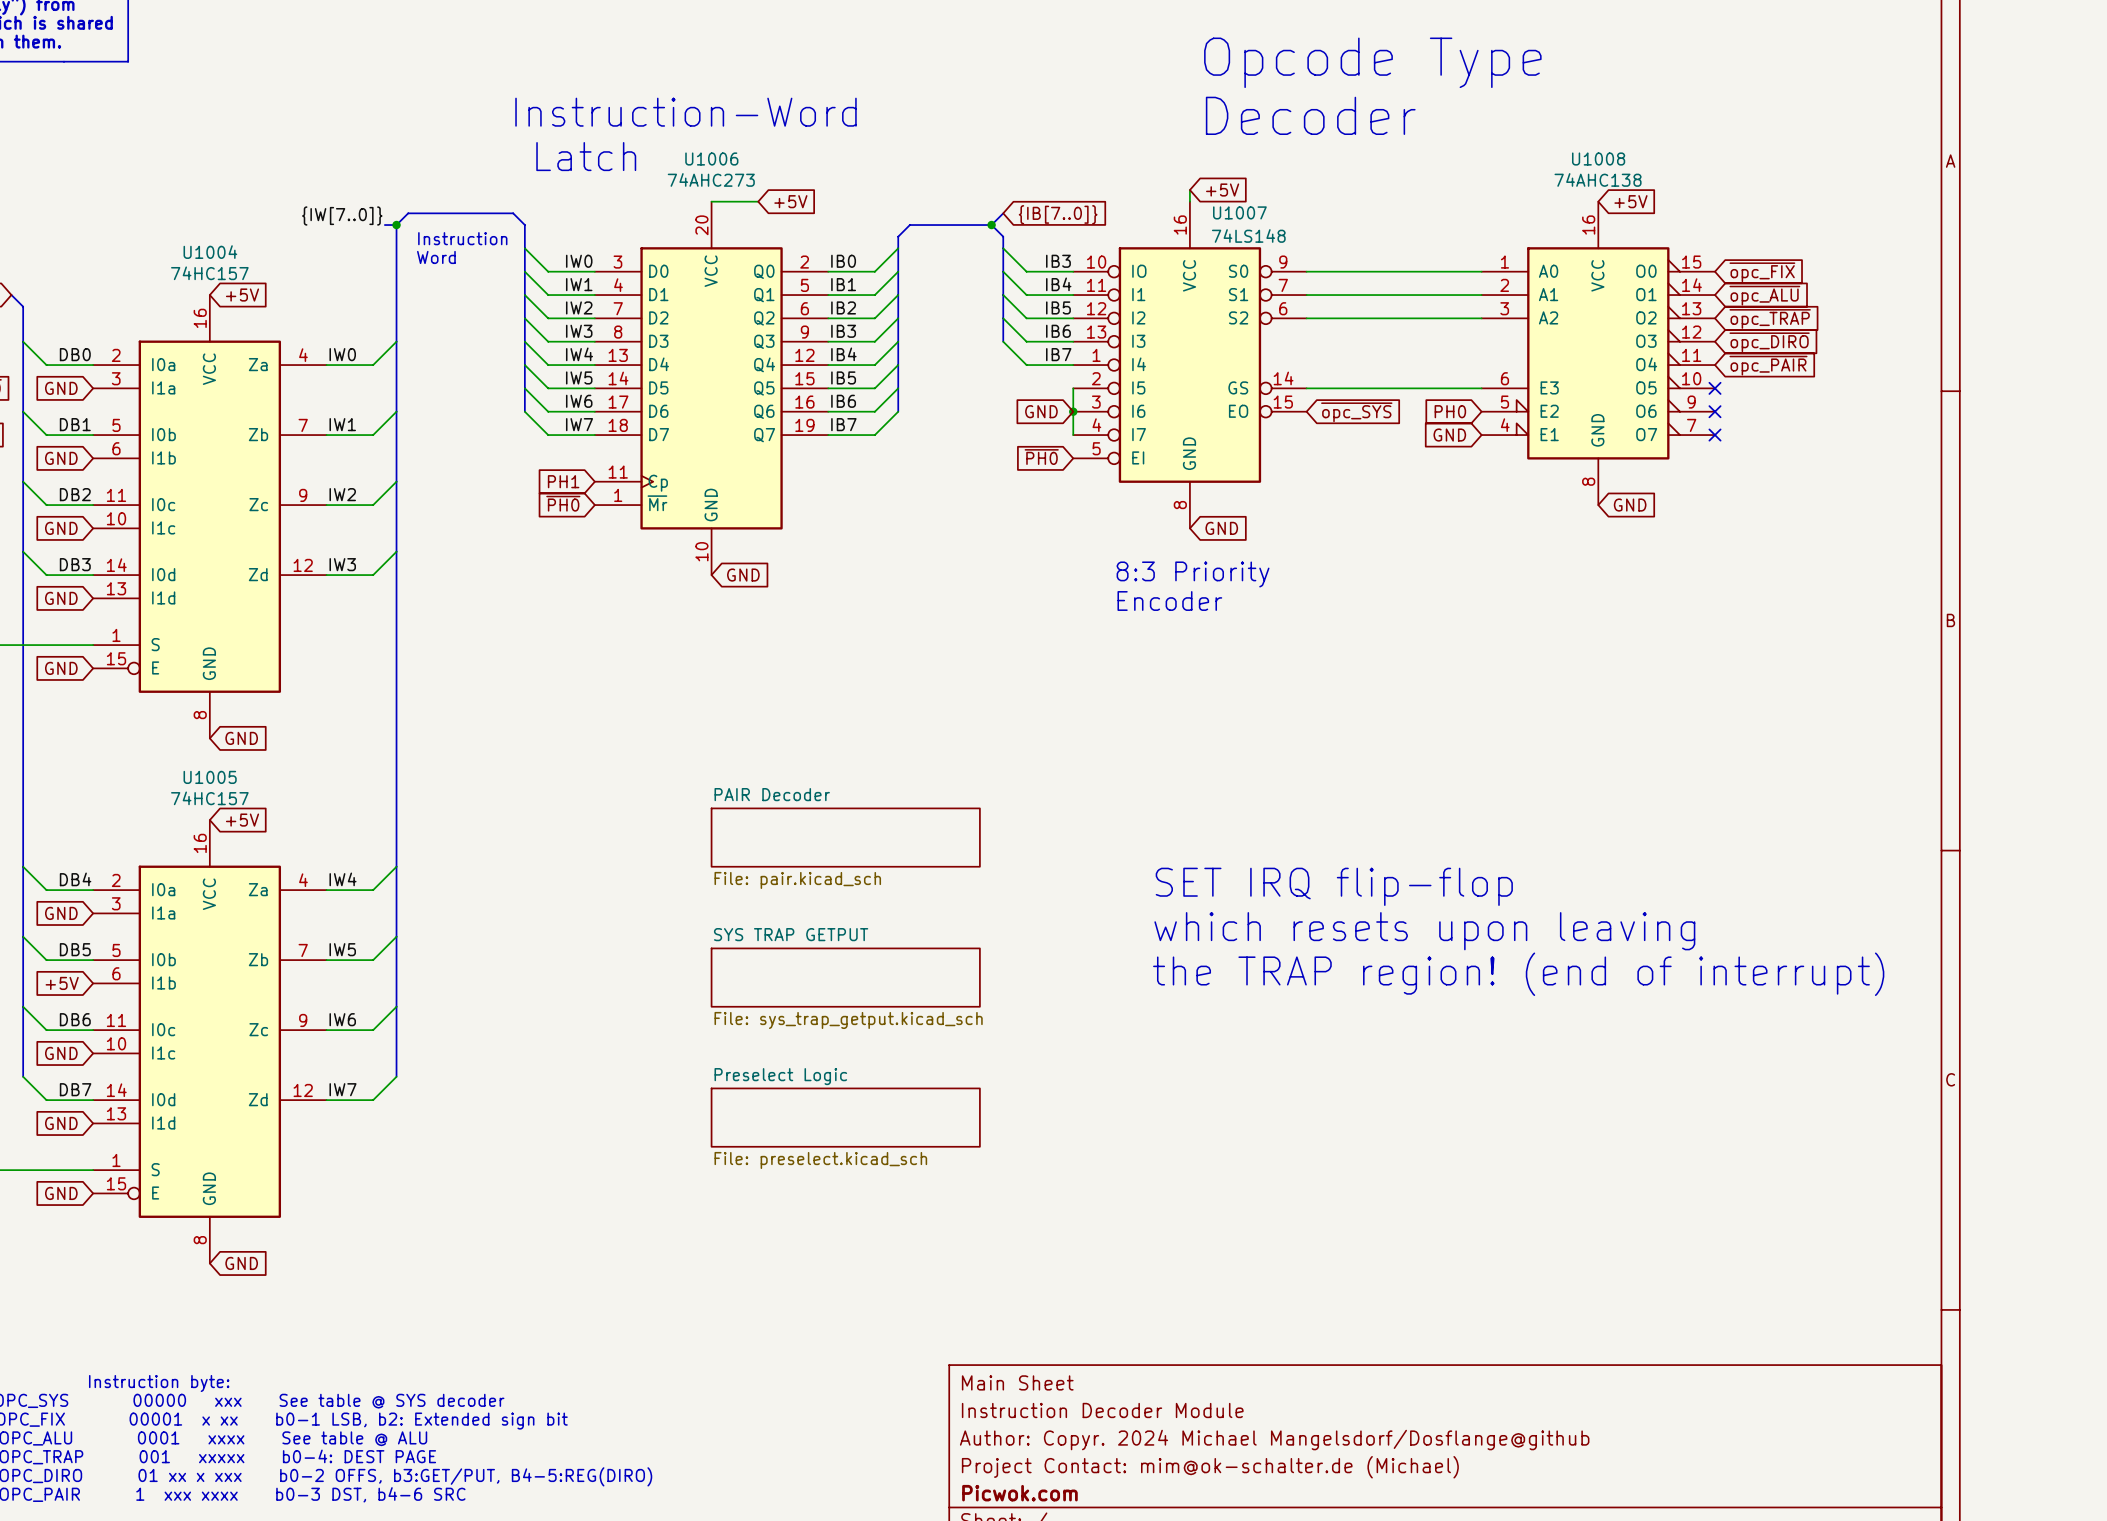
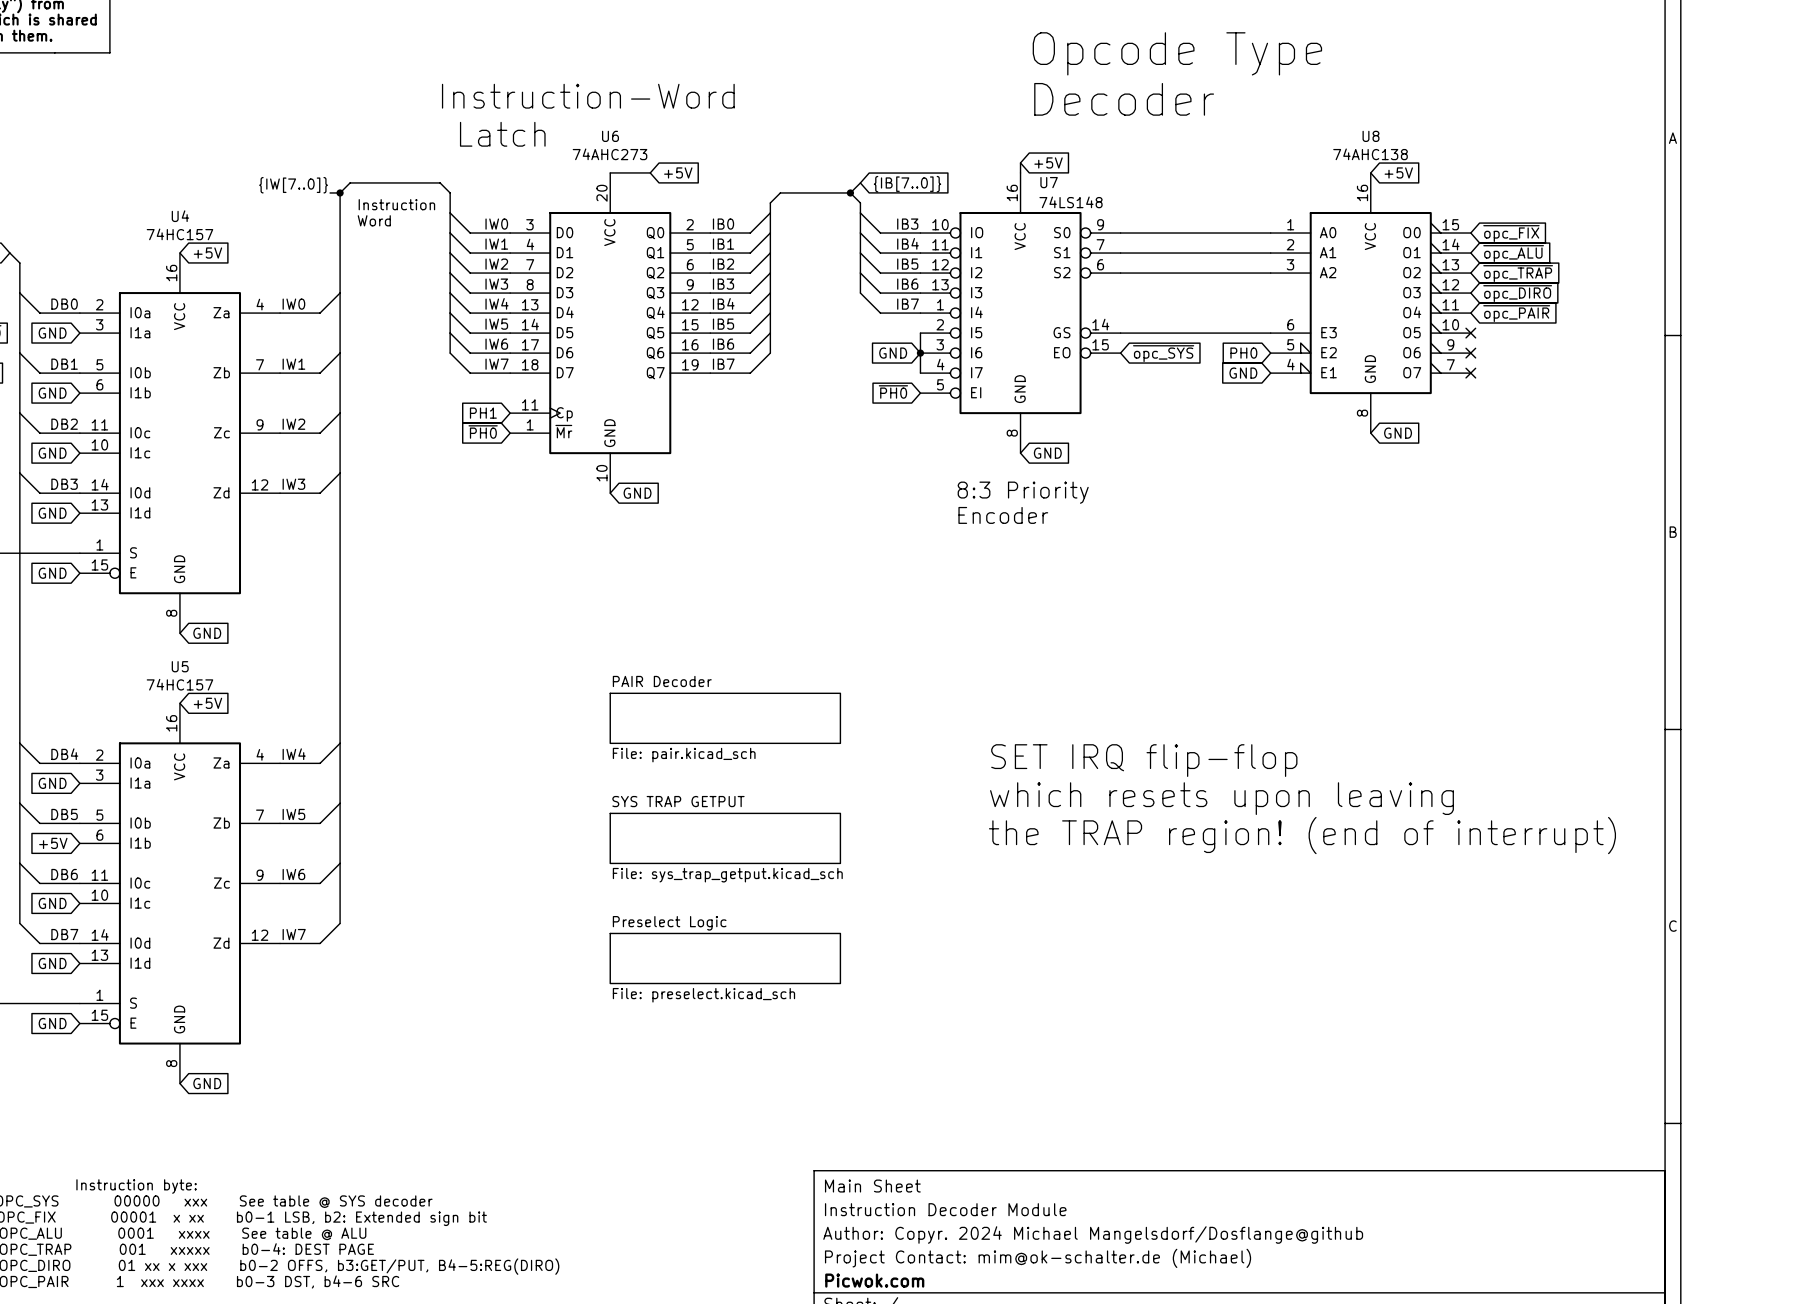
U1006 name: U1006 (711, 159) -> U6 (610, 136)
U1008 name: U1008 (1598, 159) -> U8 (1371, 136)
U1007 name: U1007 (1239, 212) -> U7 (1049, 182)
U1004 name: U1004 (210, 252) -> U4 (180, 216)
U1005 name: U1005 (210, 777) -> U5 (180, 666)

